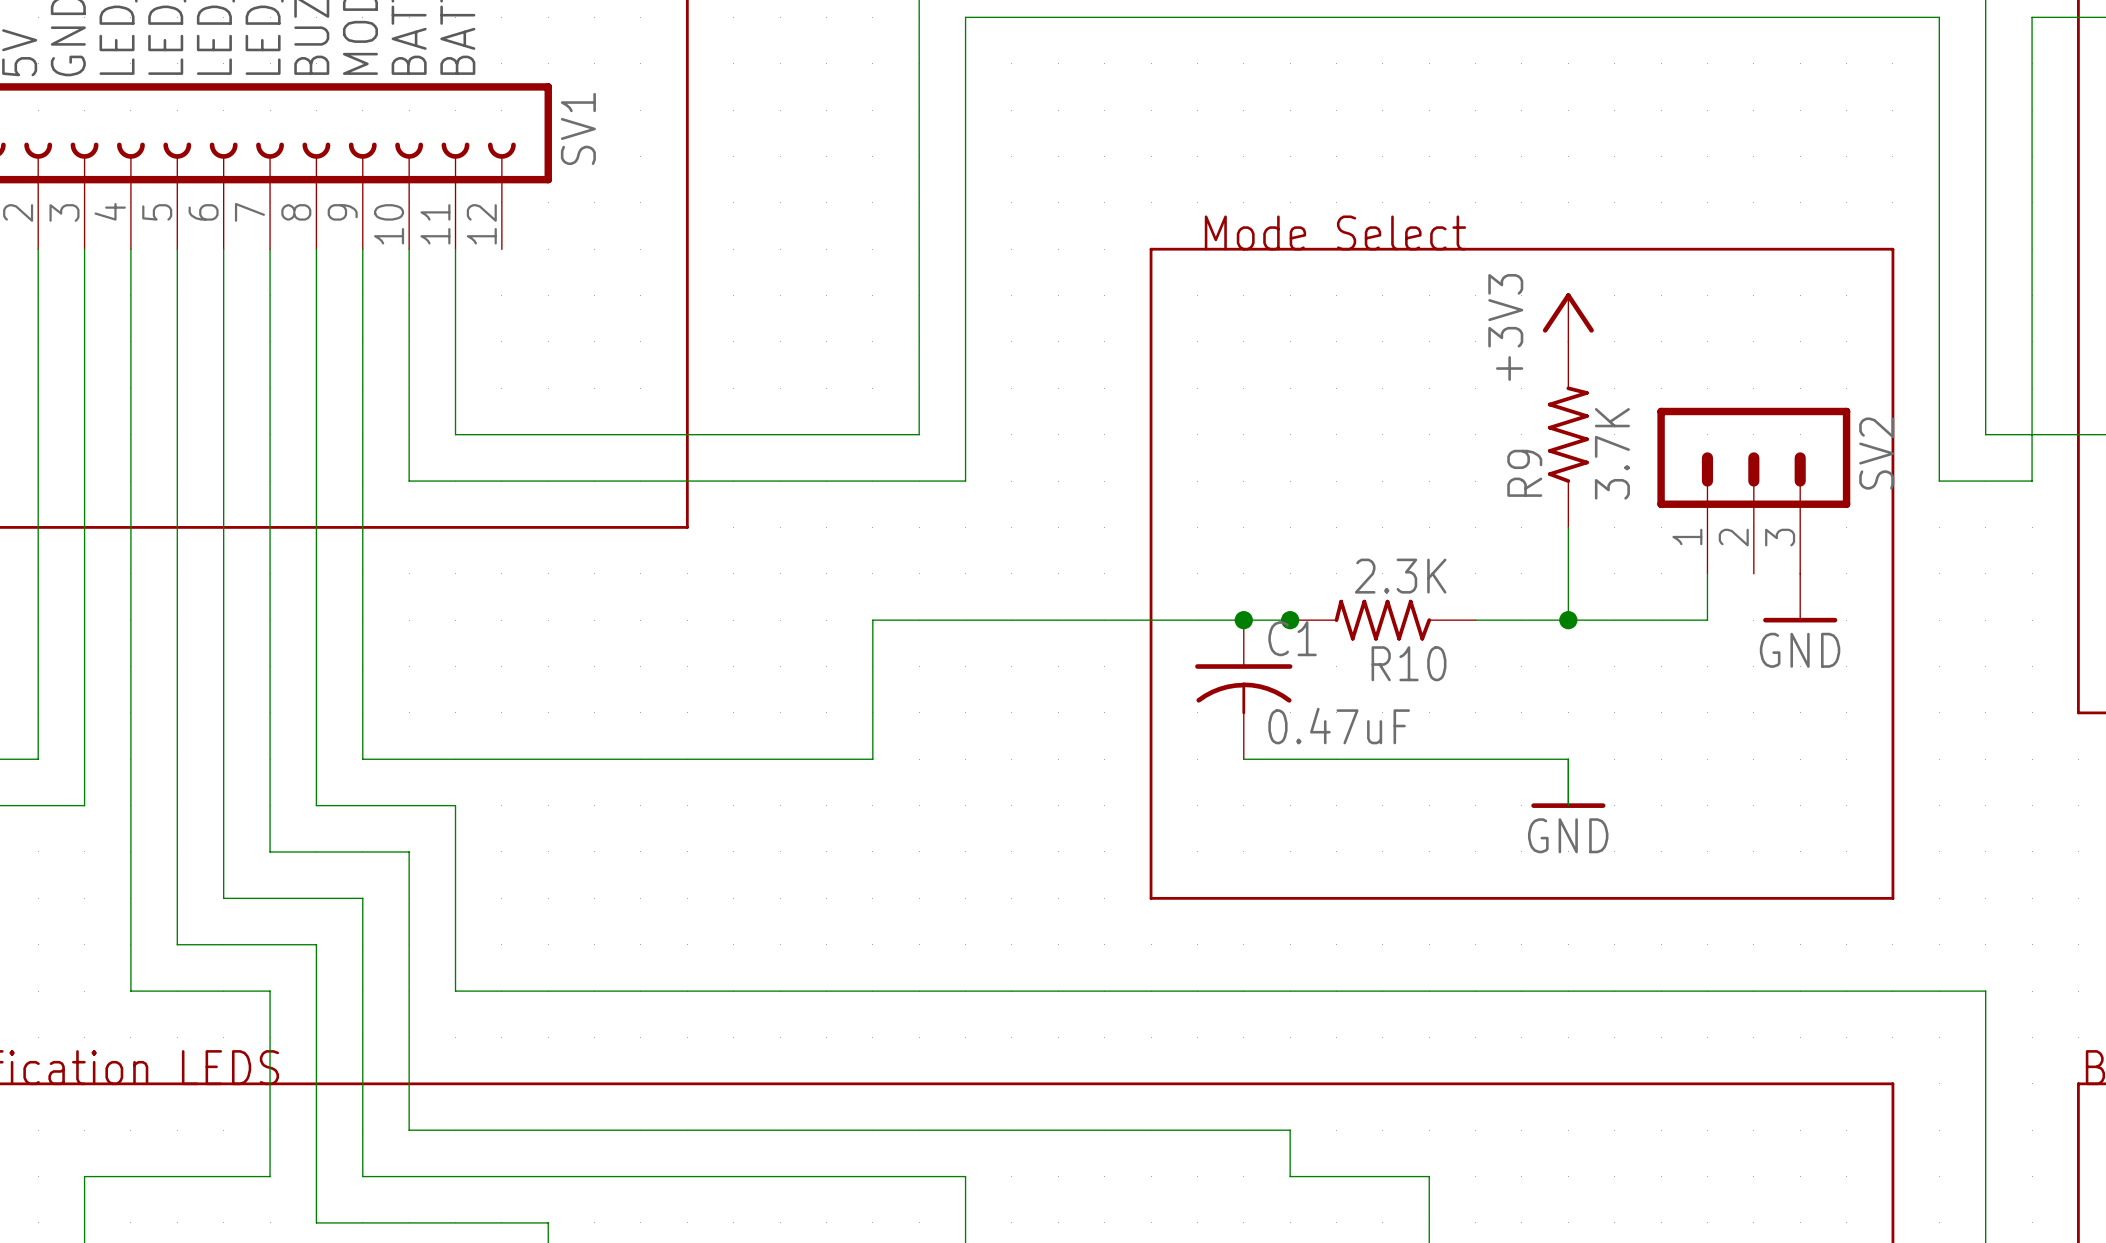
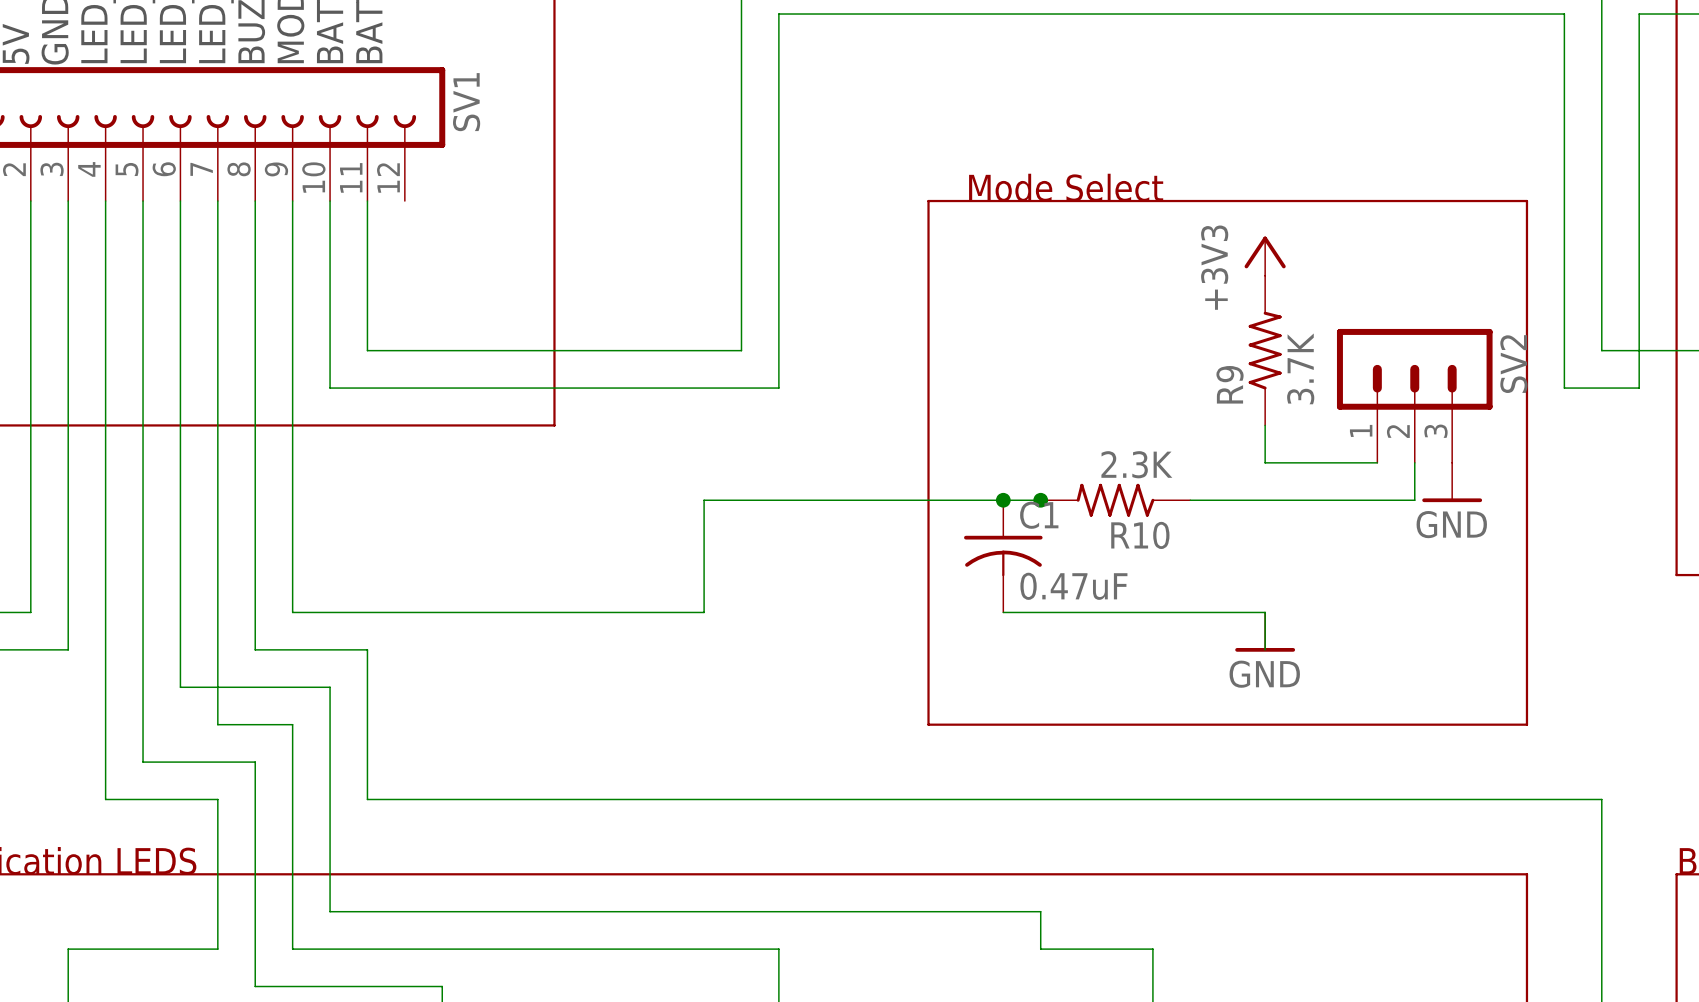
wire: (1568, 573) (1568, 620) -> (1265, 462) (1377, 462)
wire: (1707, 573) (1707, 620) -> (1414, 462) (1414, 500) (1377, 500)
junction: (1568, 620) -> none
wire: (223, 851) (223, 898) (270, 898) -> (180, 687) (217, 687) (217, 724)

